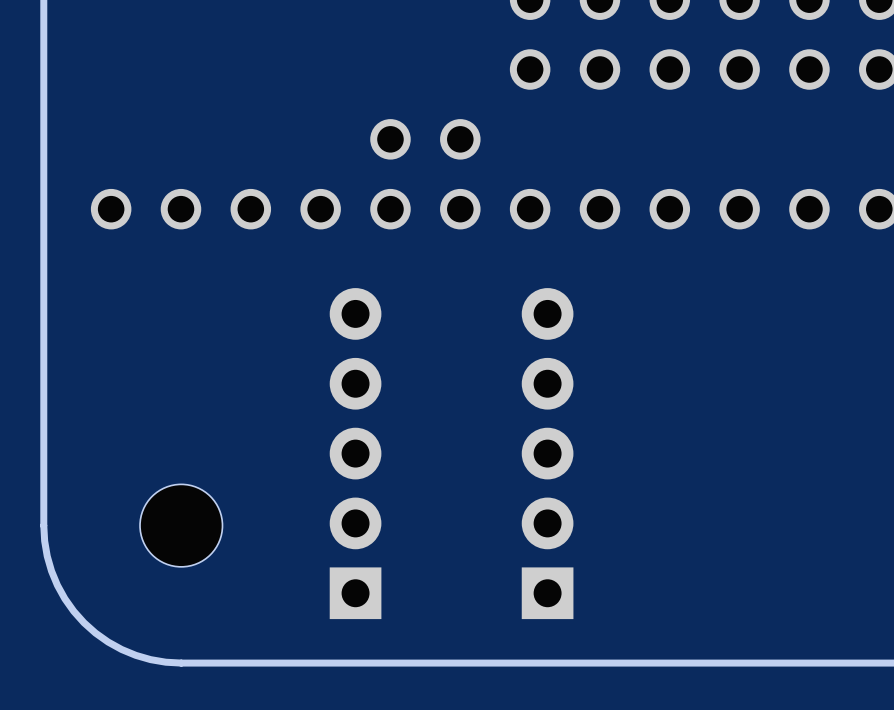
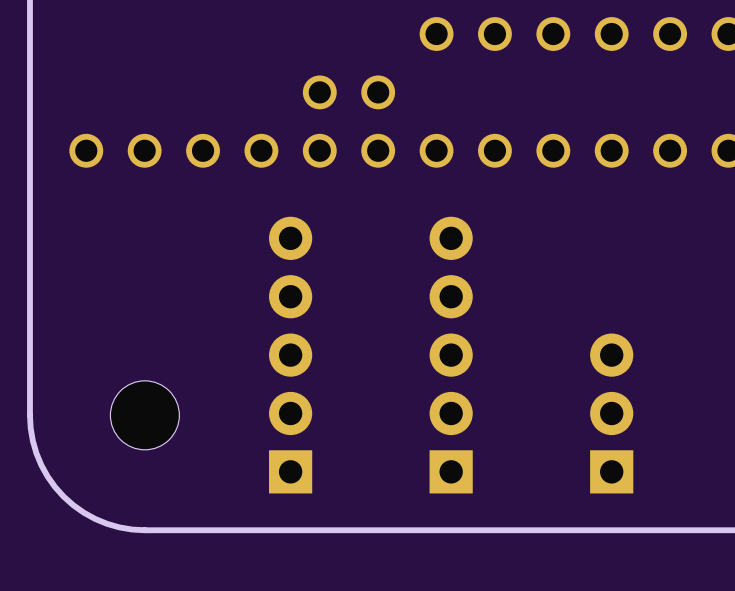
part: none -> (611, 413)

